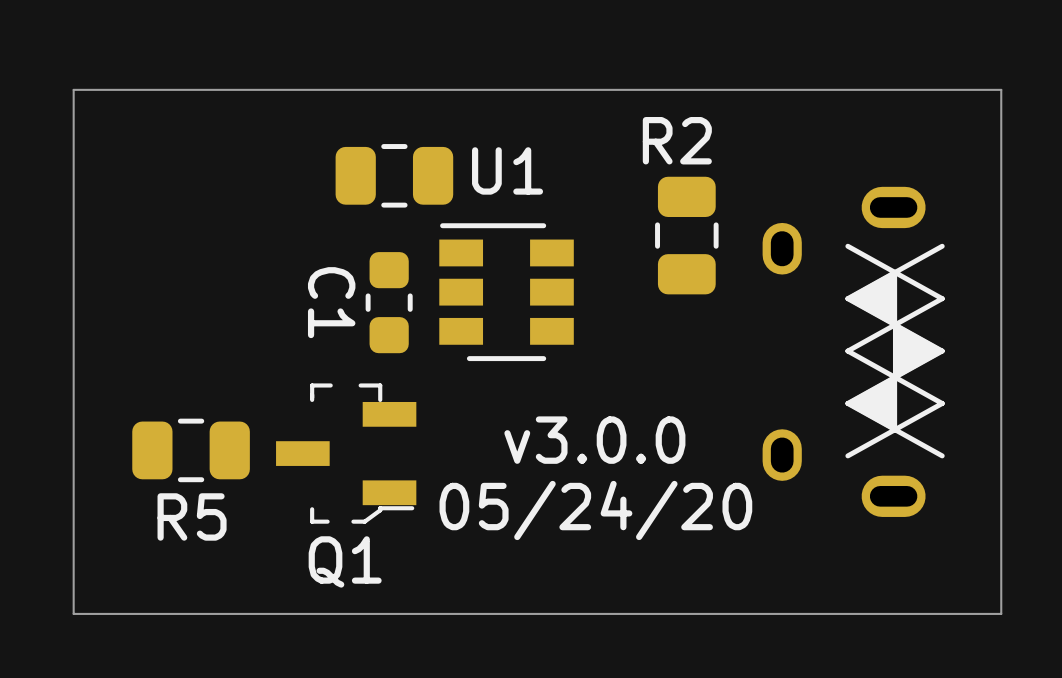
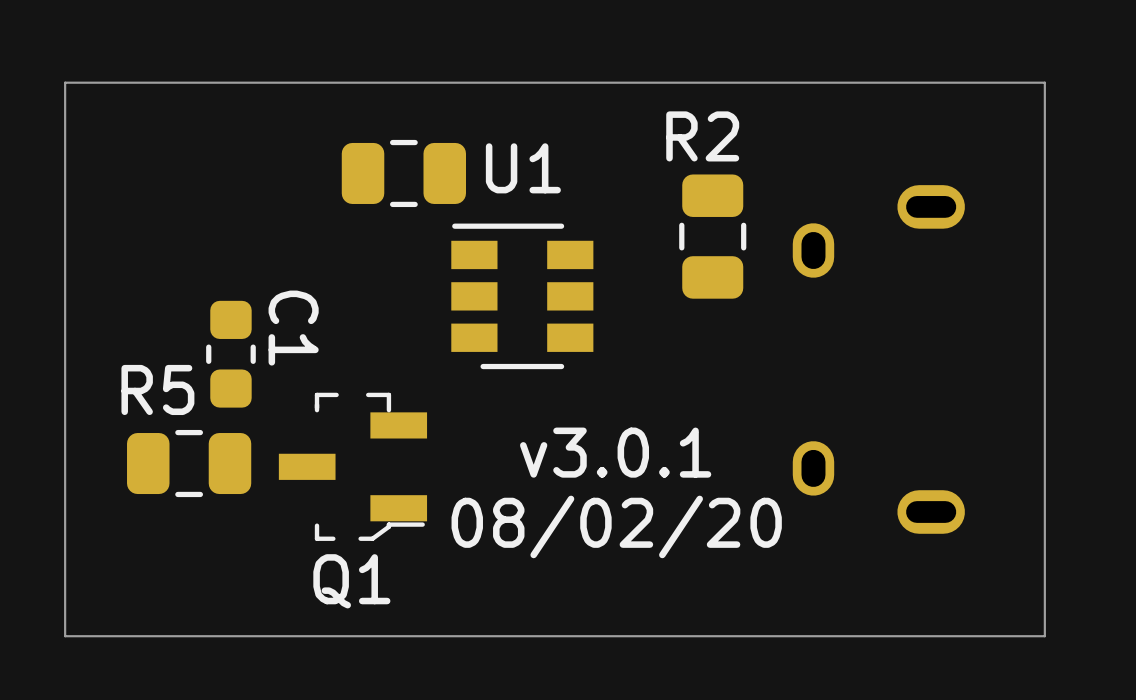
drawing: [845, 243, 945, 459] -> none
C1 name position: C1 (331, 302) -> C1 (293, 328)
C1 position: (389, 302) -> (230, 354)
text: v3.0.0 (594, 440) -> v3.0.1 (615, 452)
text: 05/24/20 (595, 510) -> 08/02/20 (616, 526)
R5 name position: R5 (192, 516) -> R5 (157, 389)

